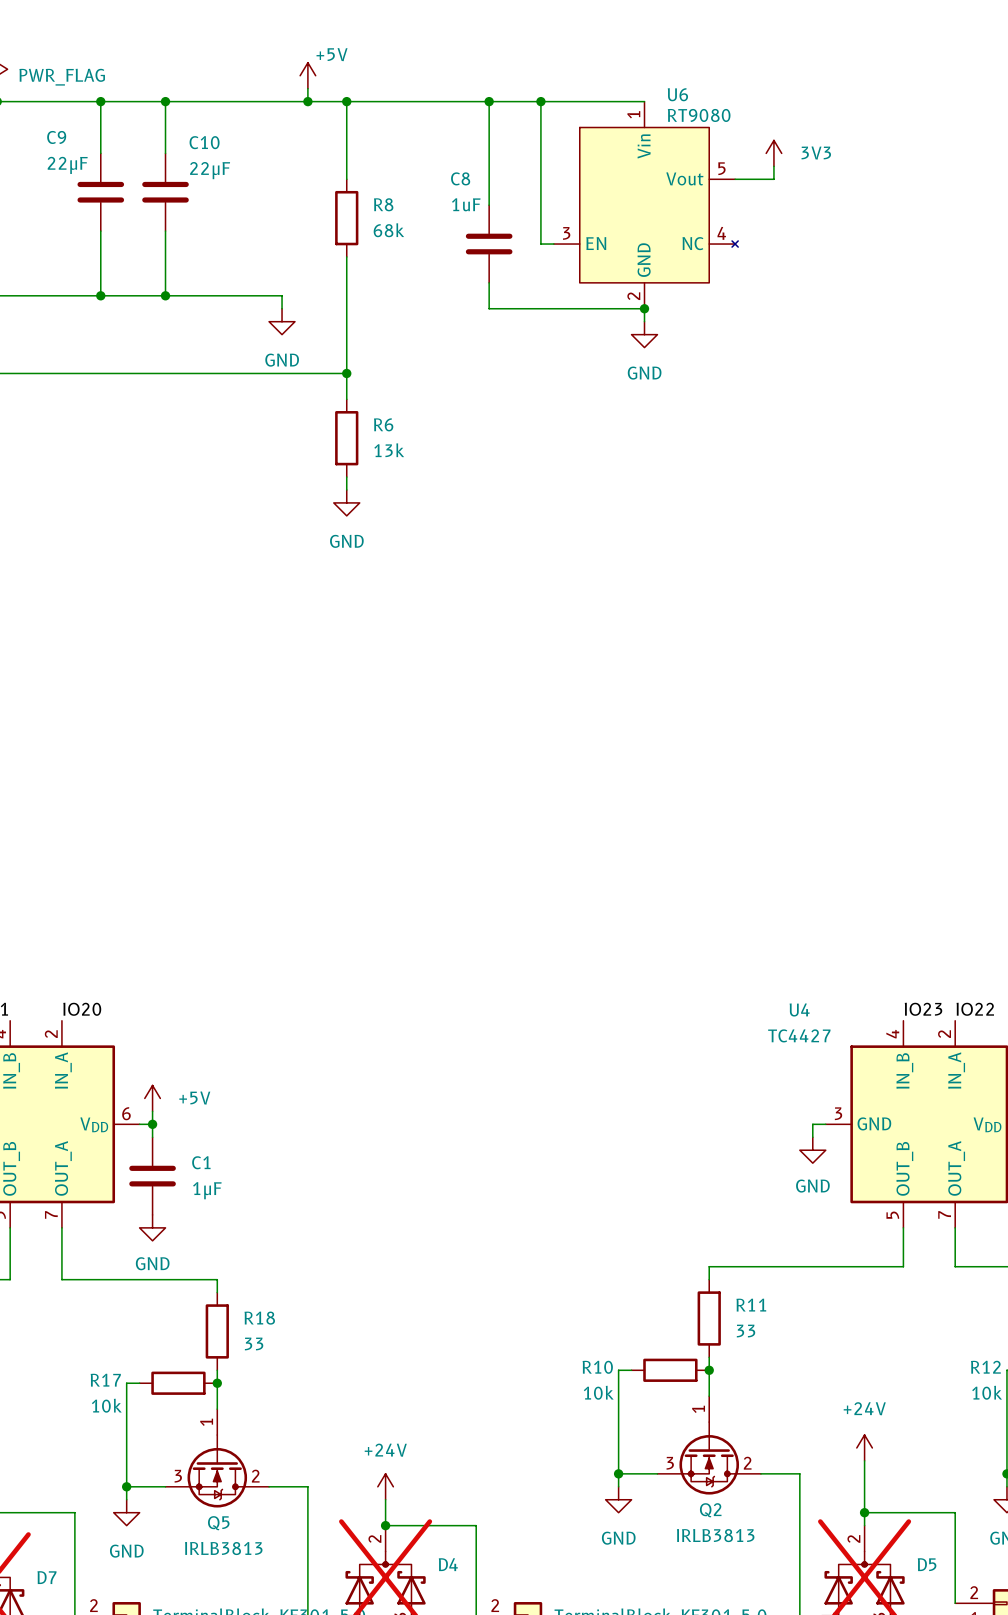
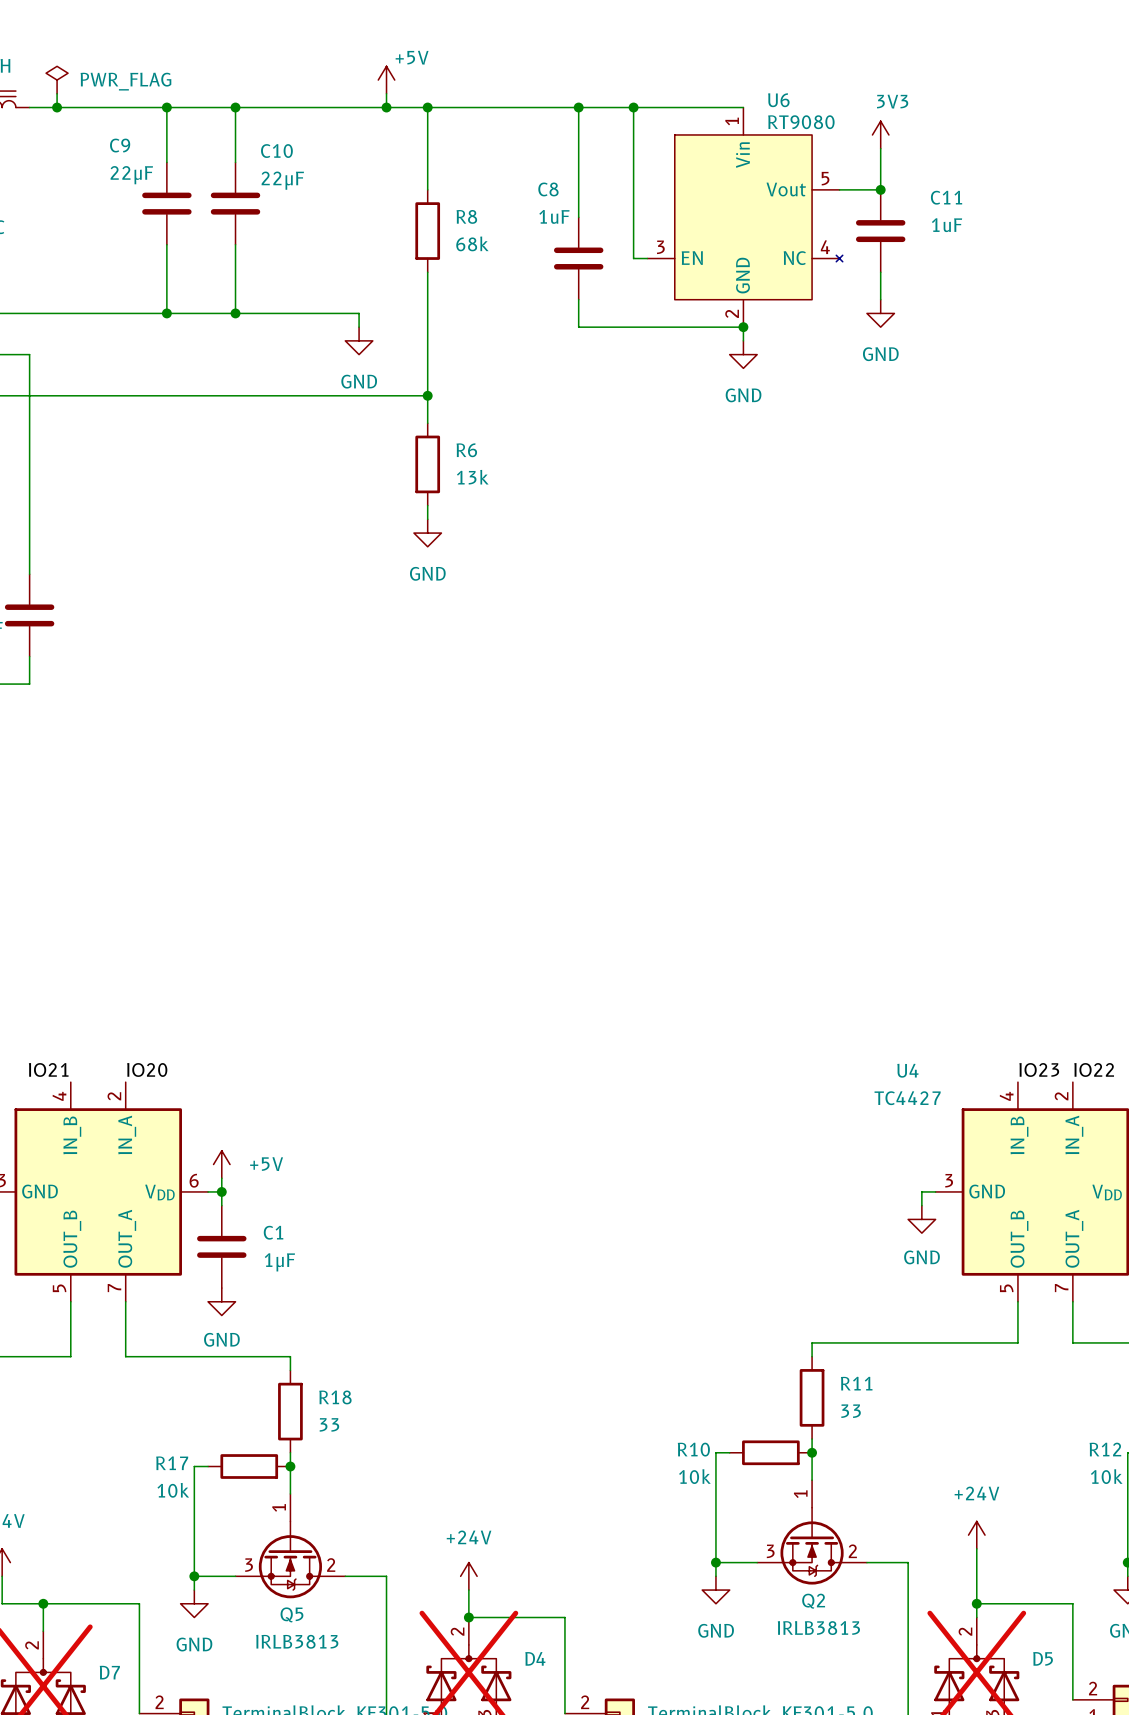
power symbol position: 3V3 (773, 153) -> 3V3 (880, 134)
power symbol text position: 3V3 (816, 153) -> 3V3 (892, 101)
junction: none -> (880, 189)
C11: none -> 1uF (880, 231)
wire: none -> (880, 272) (880, 299)
power symbol: none -> GND (880, 313)

